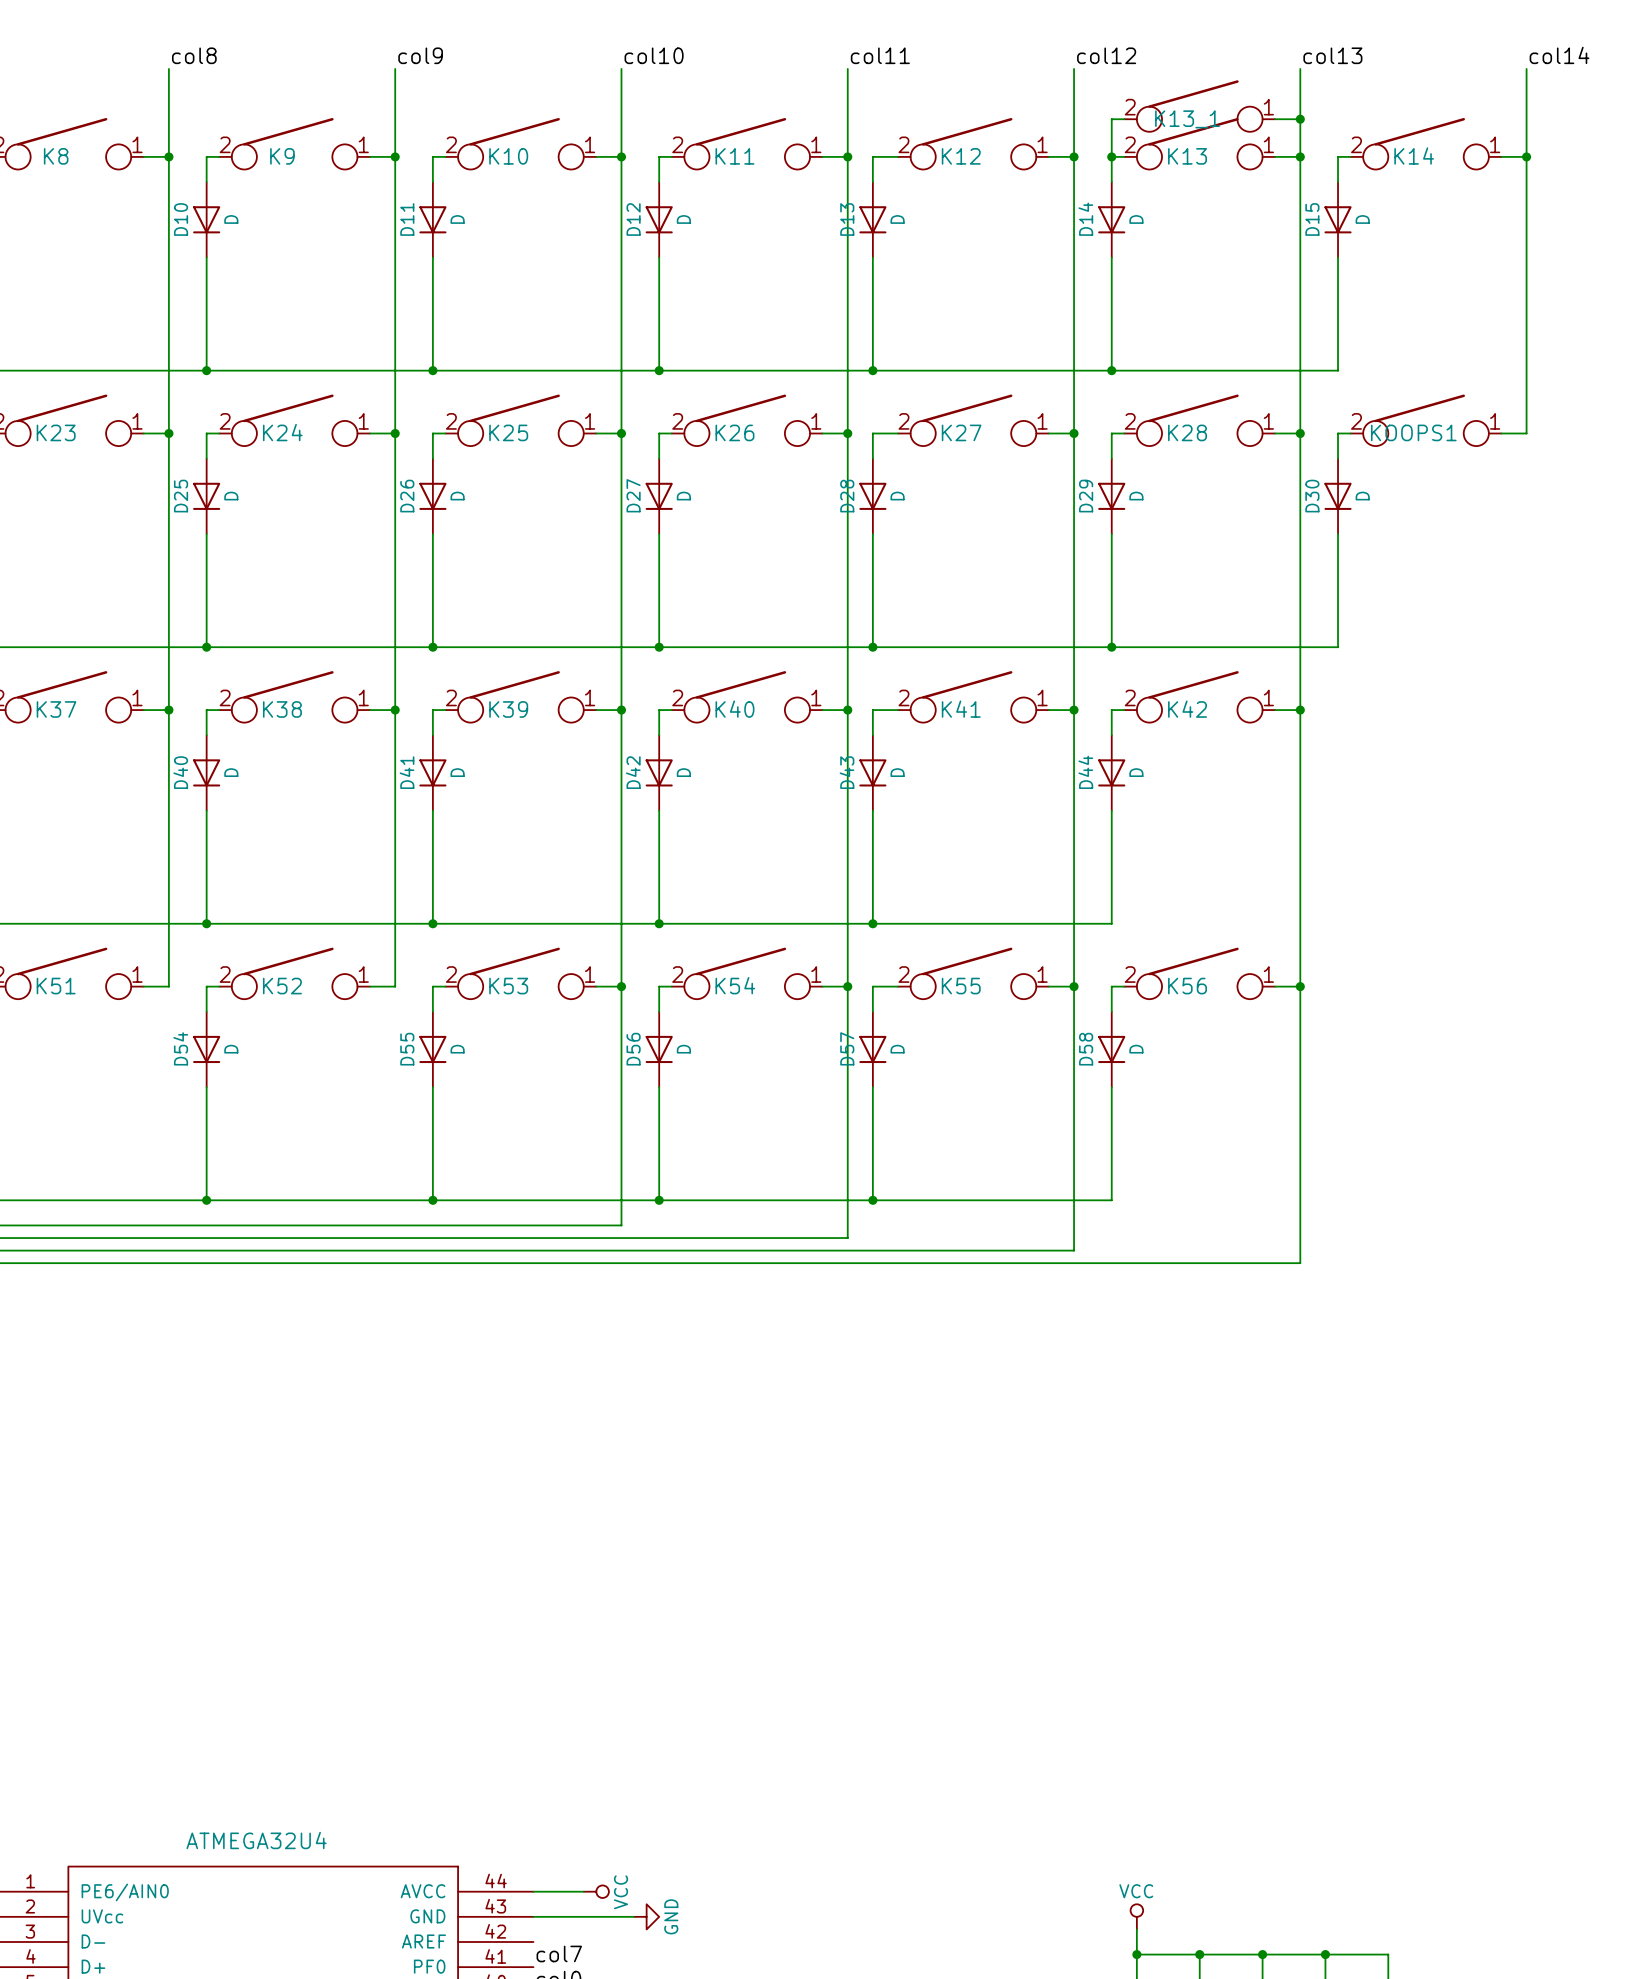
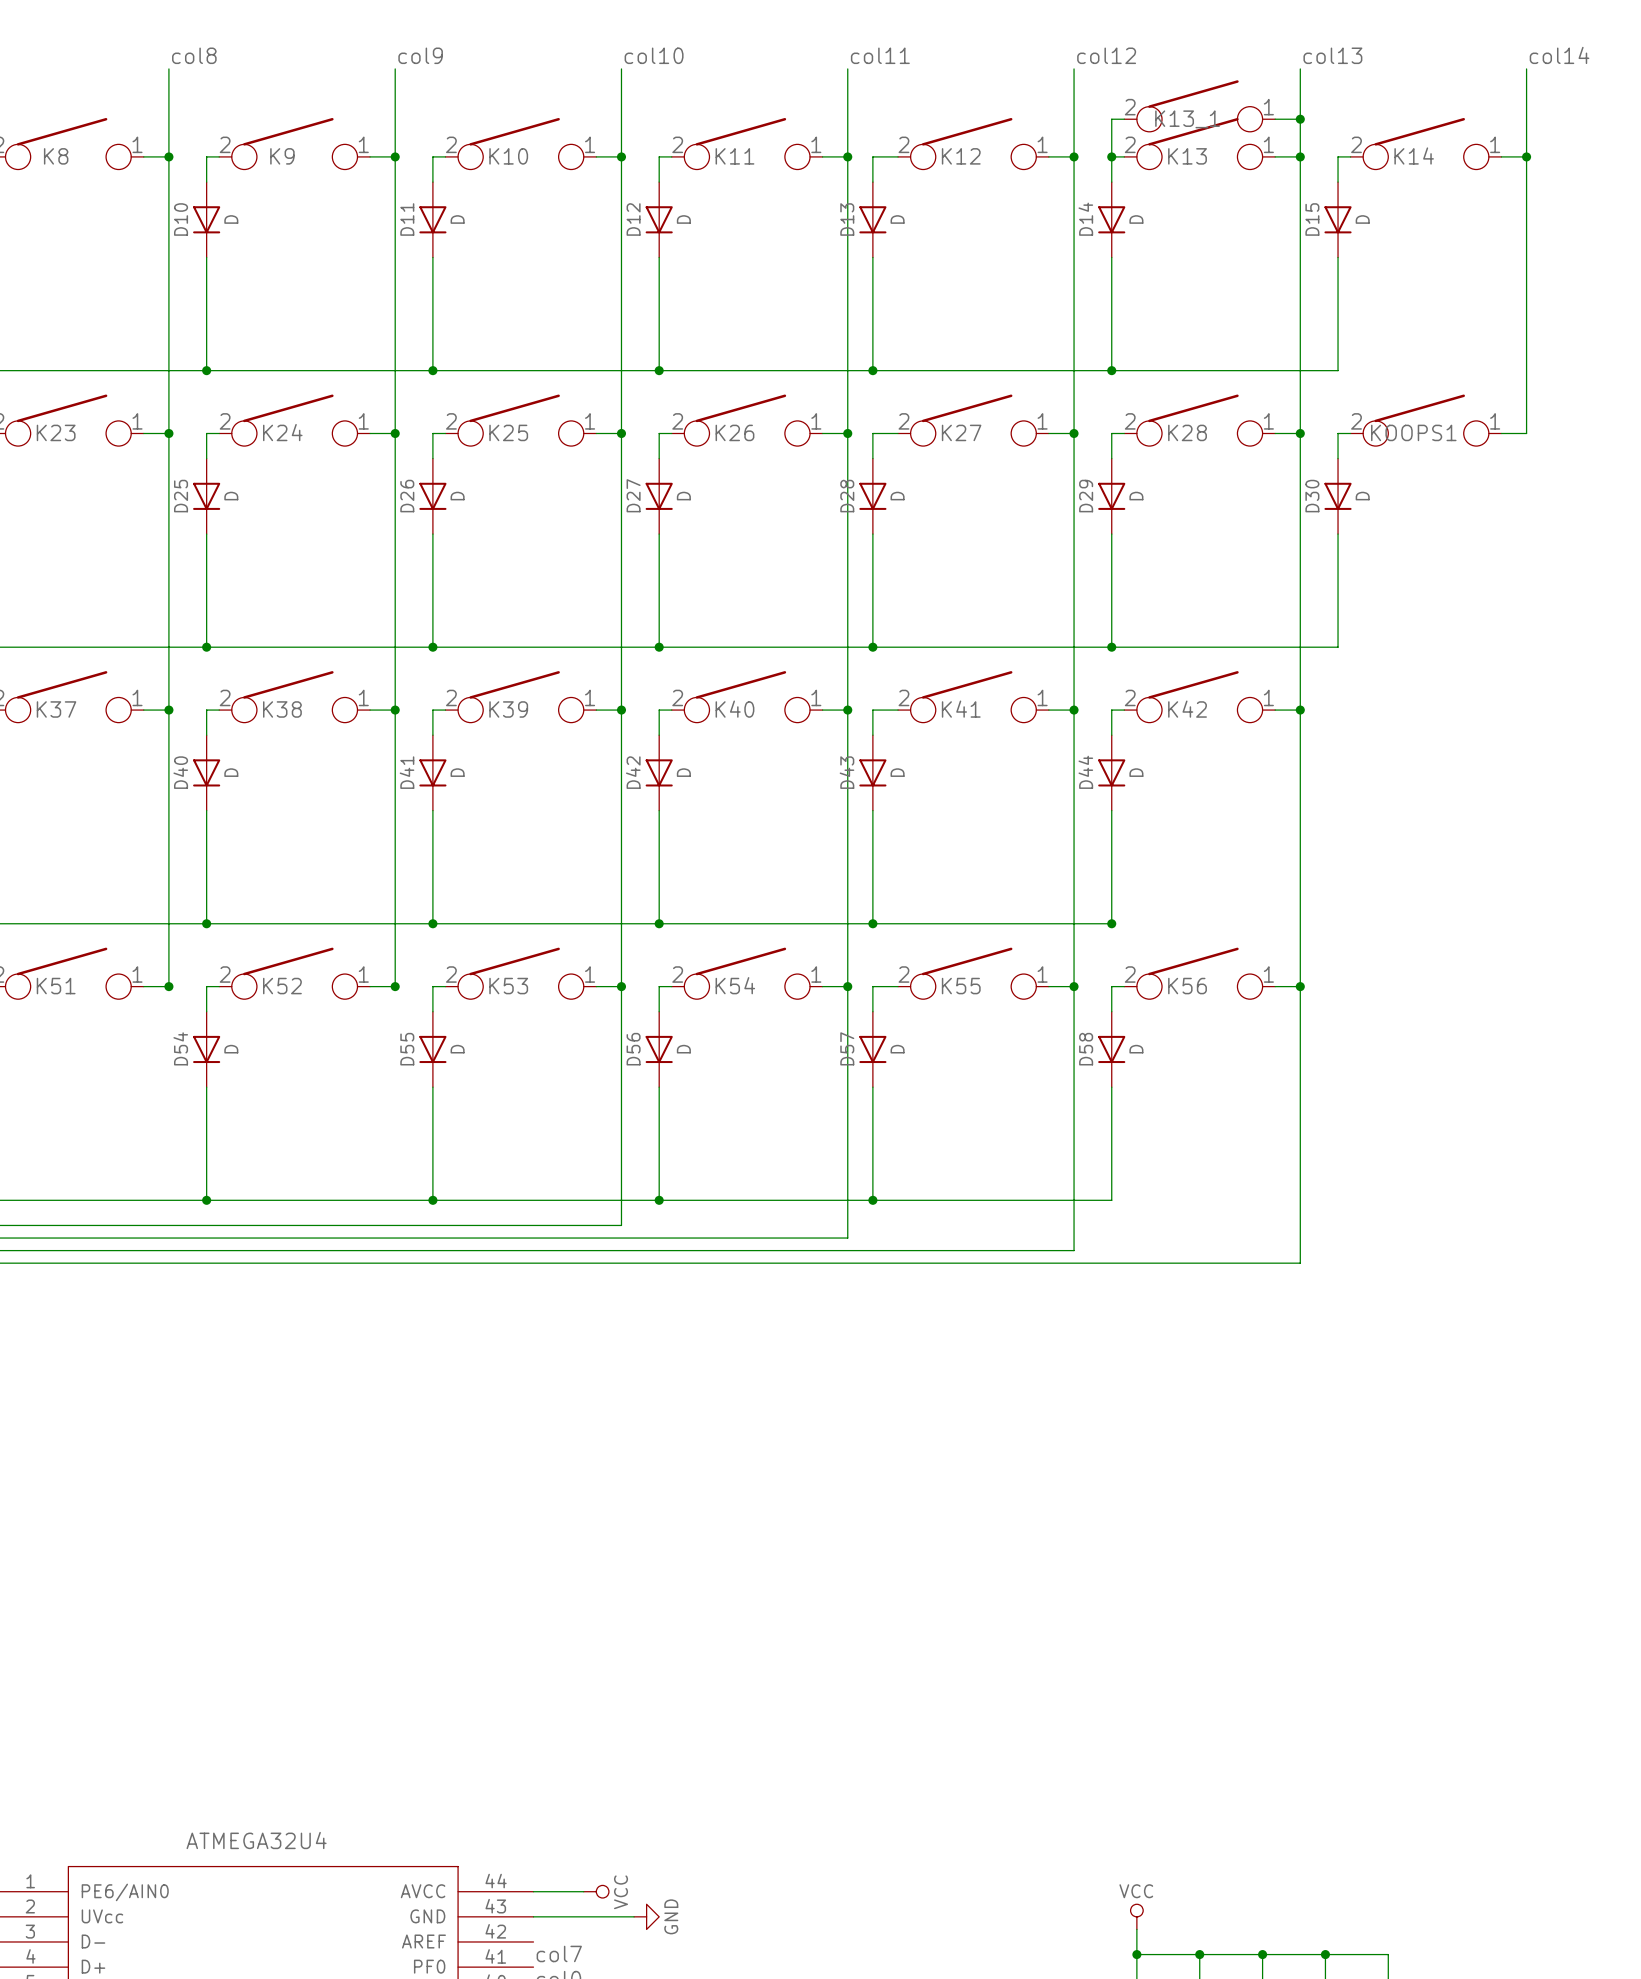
junction: none -> (1111, 923)
junction: none -> (168, 986)
junction: none -> (395, 986)

